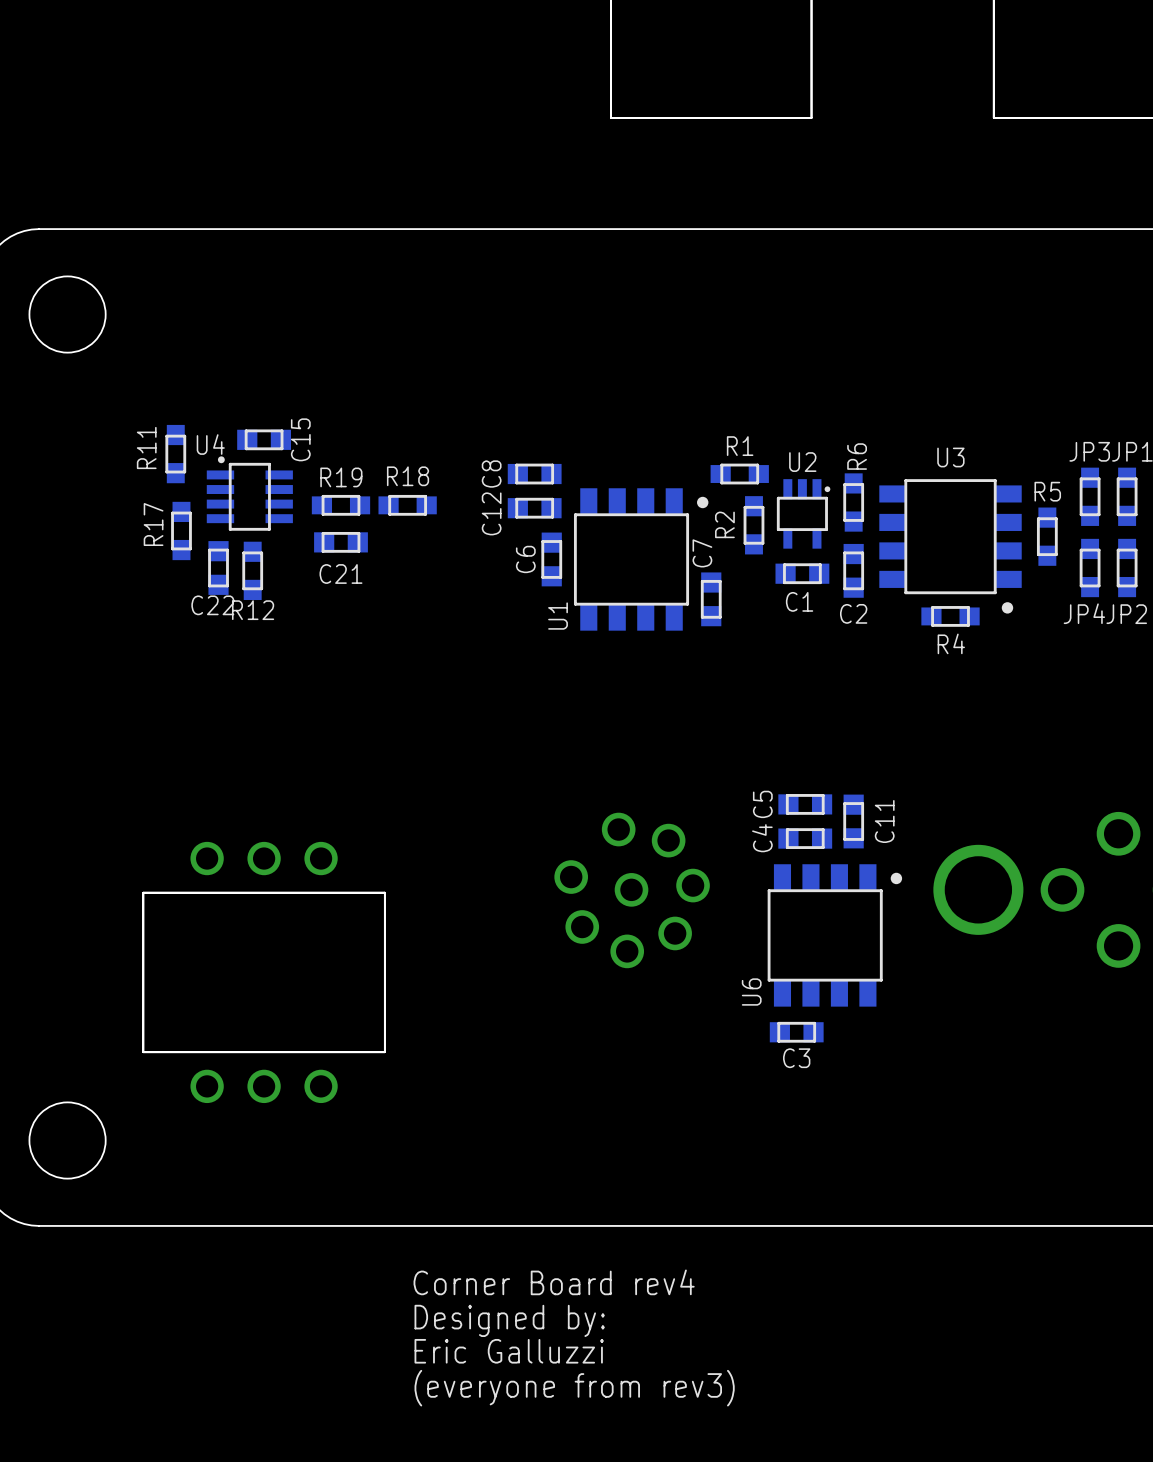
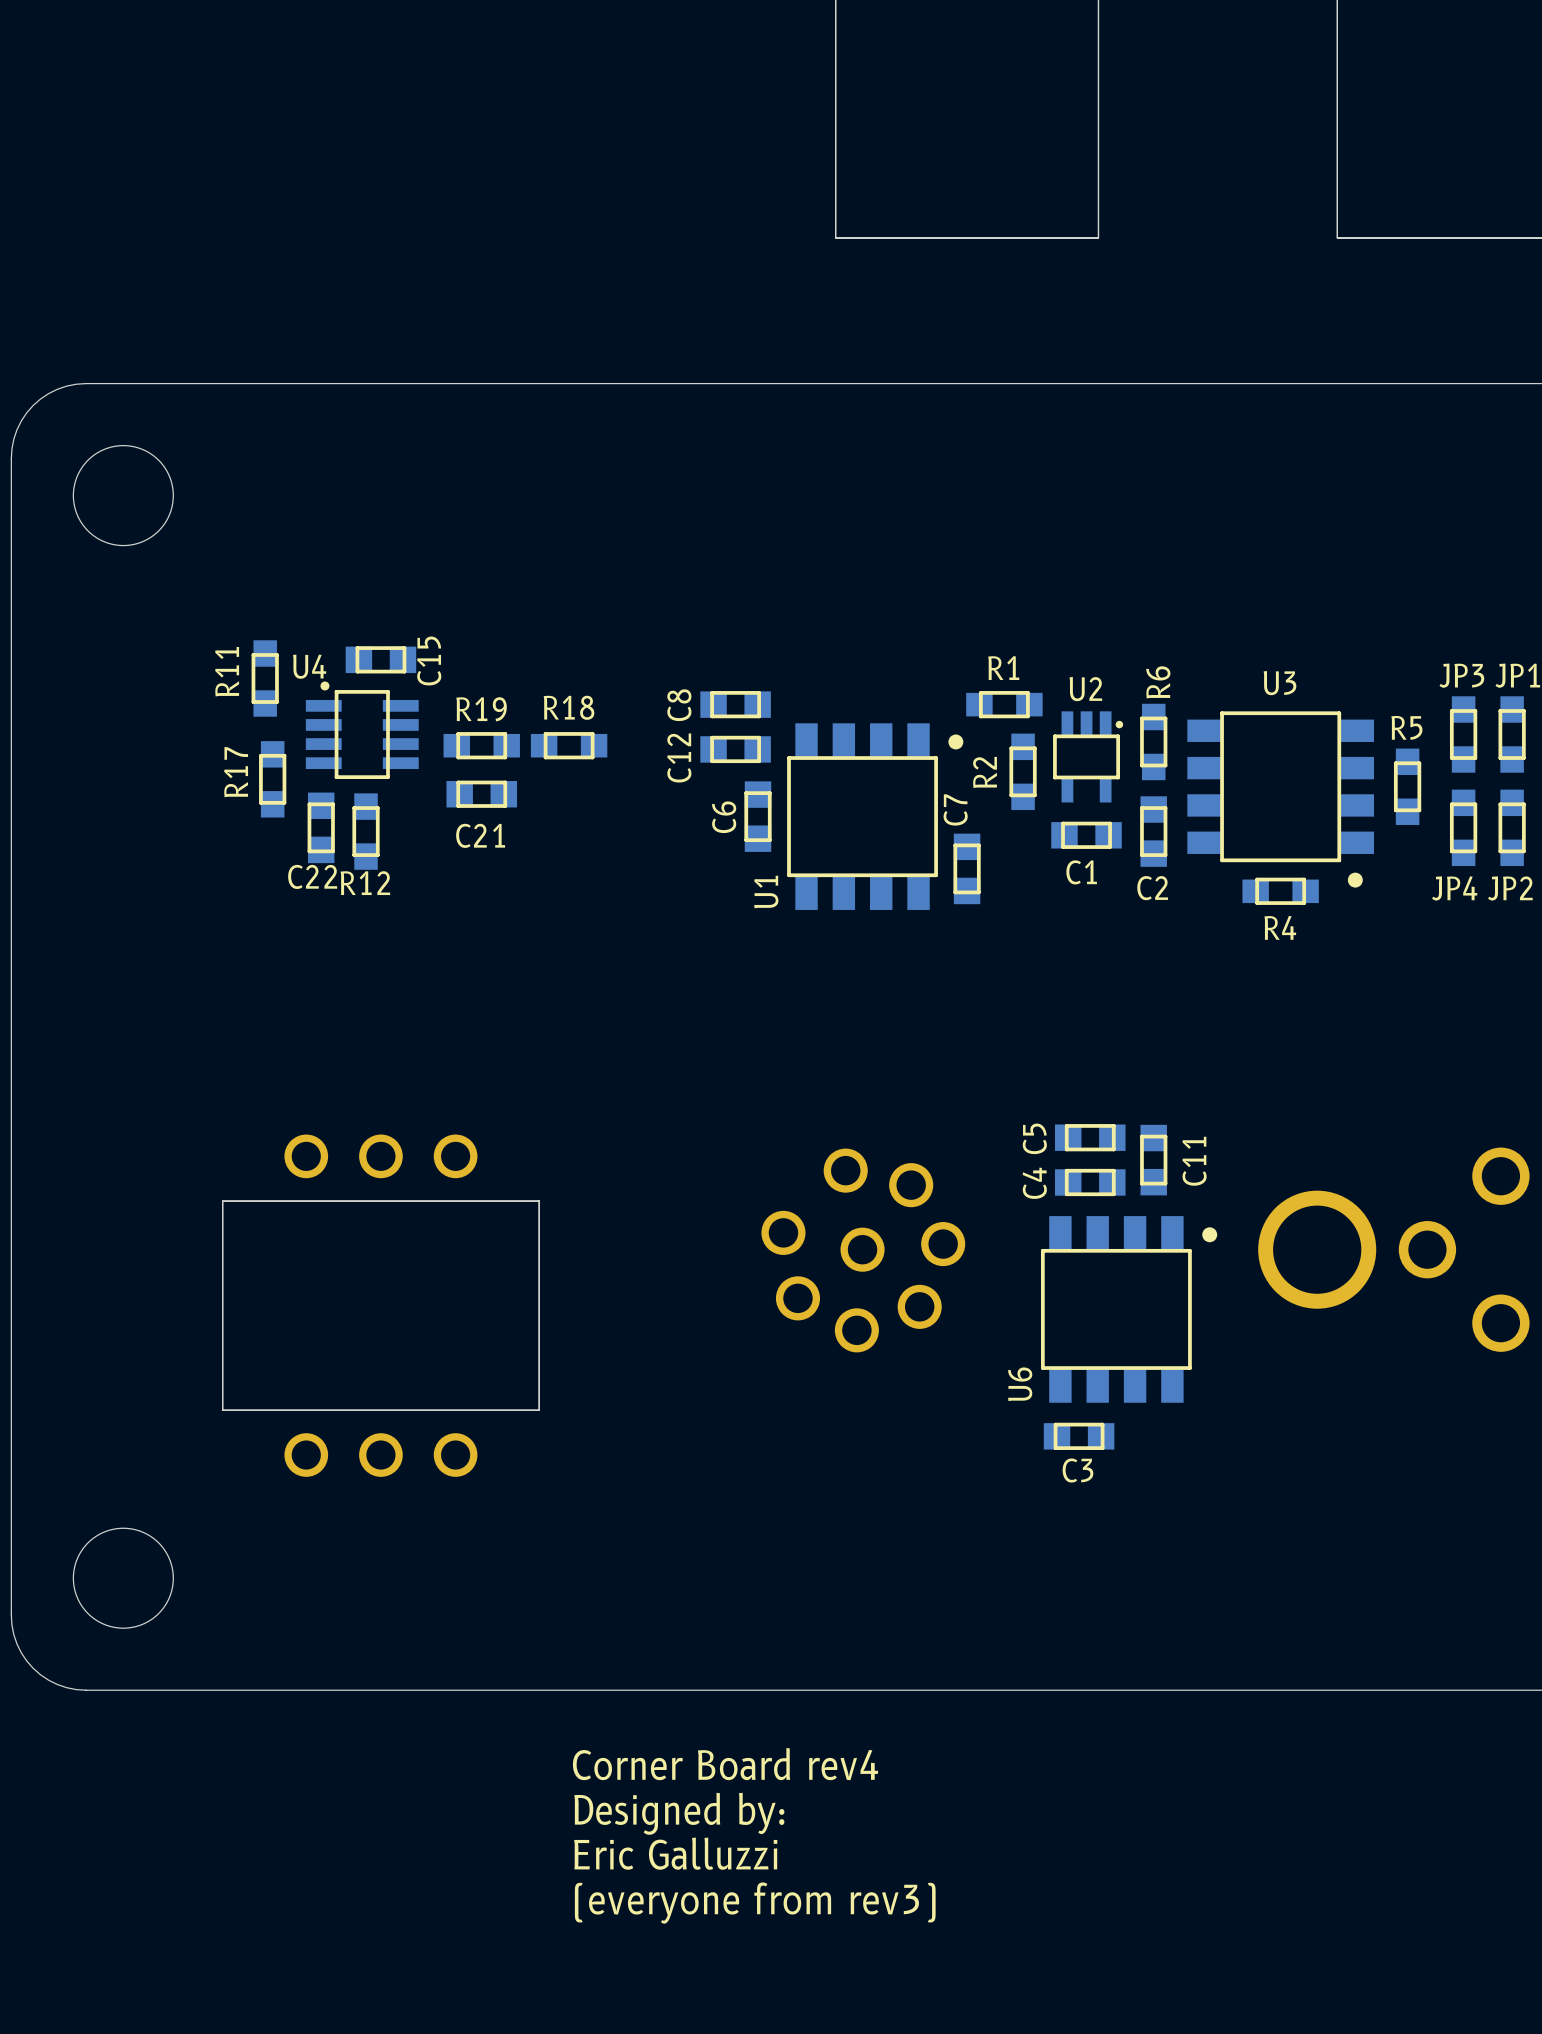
part position: (264, 972) -> (380, 1305)

